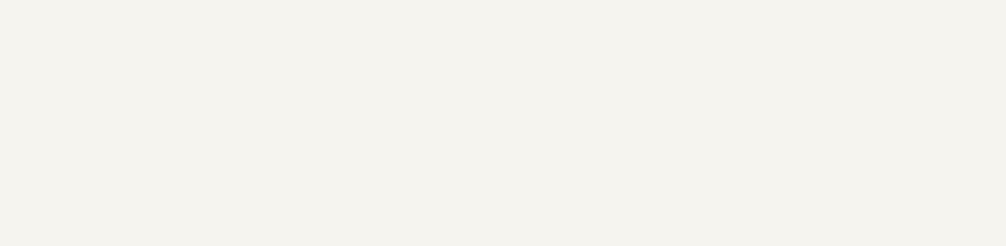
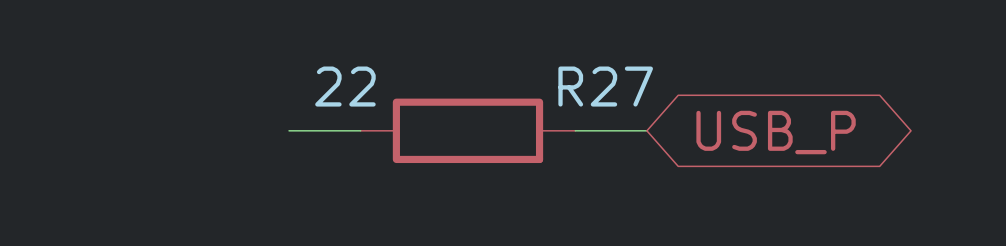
wire: none -> (289, 130) (360, 130)
R27: none -> 22 (467, 130)
wire: none -> (575, 130) (646, 130)
global label: none -> USB_P (776, 132)

